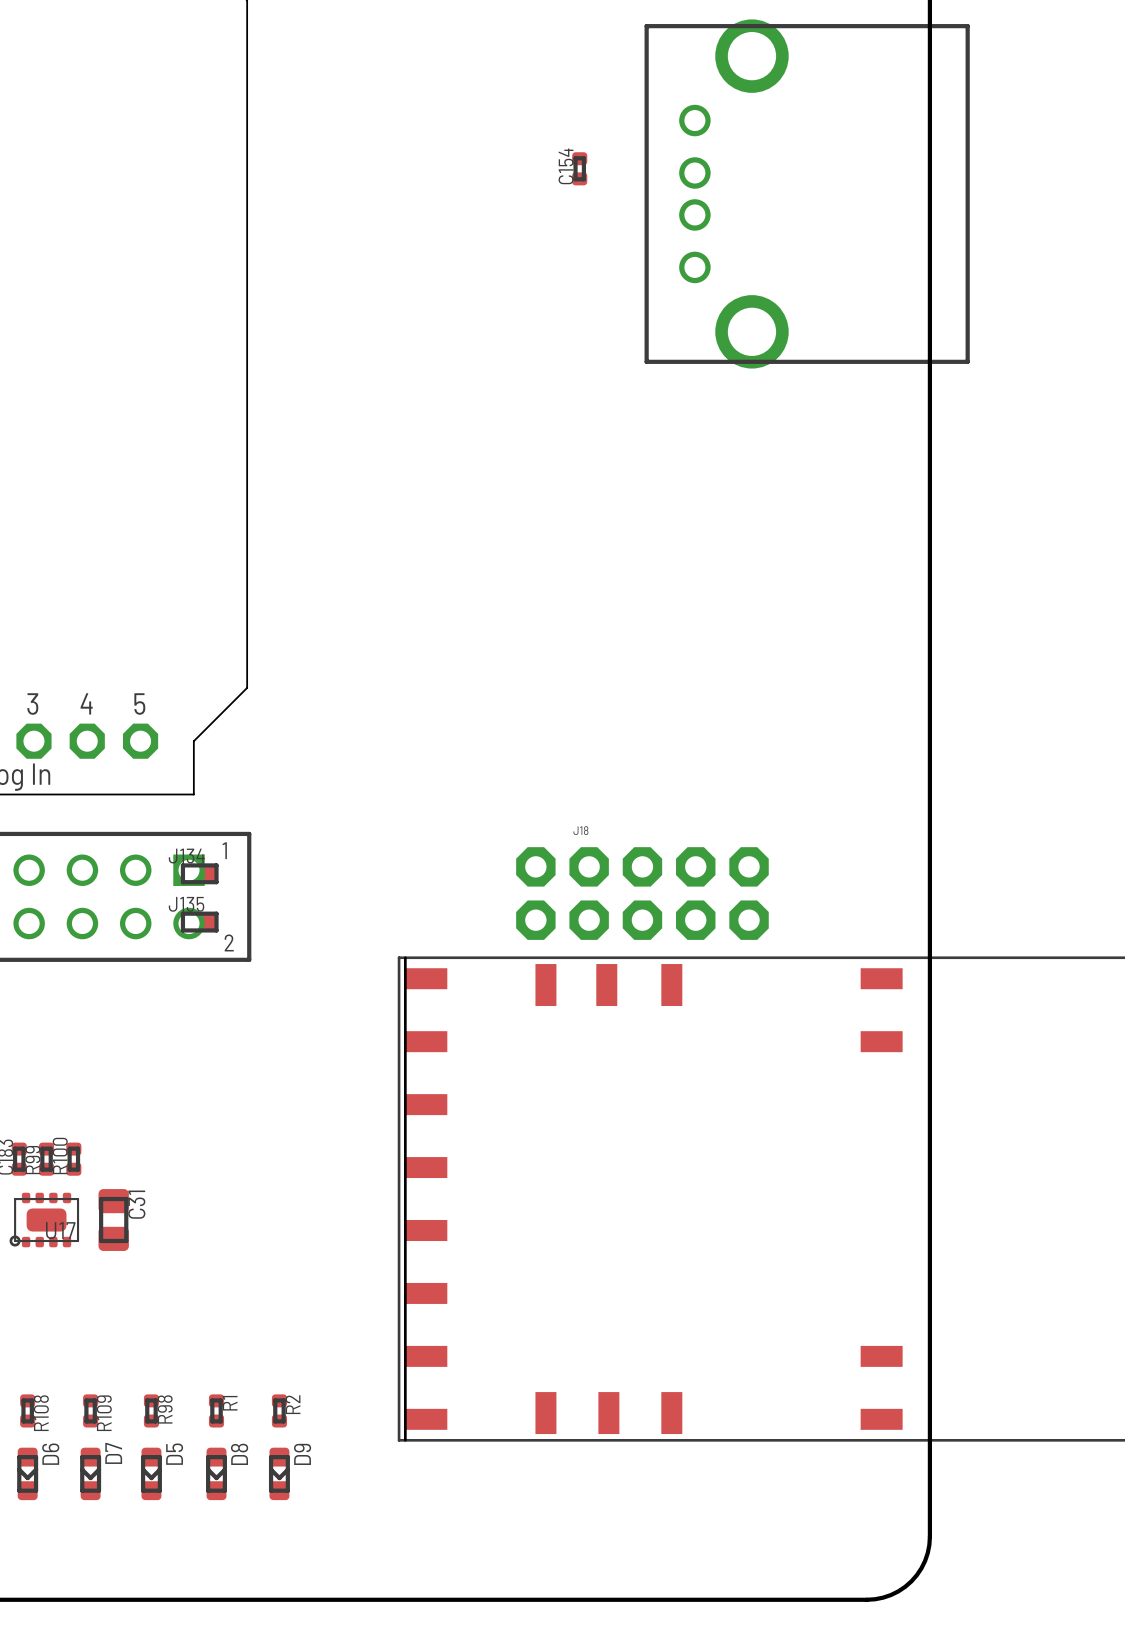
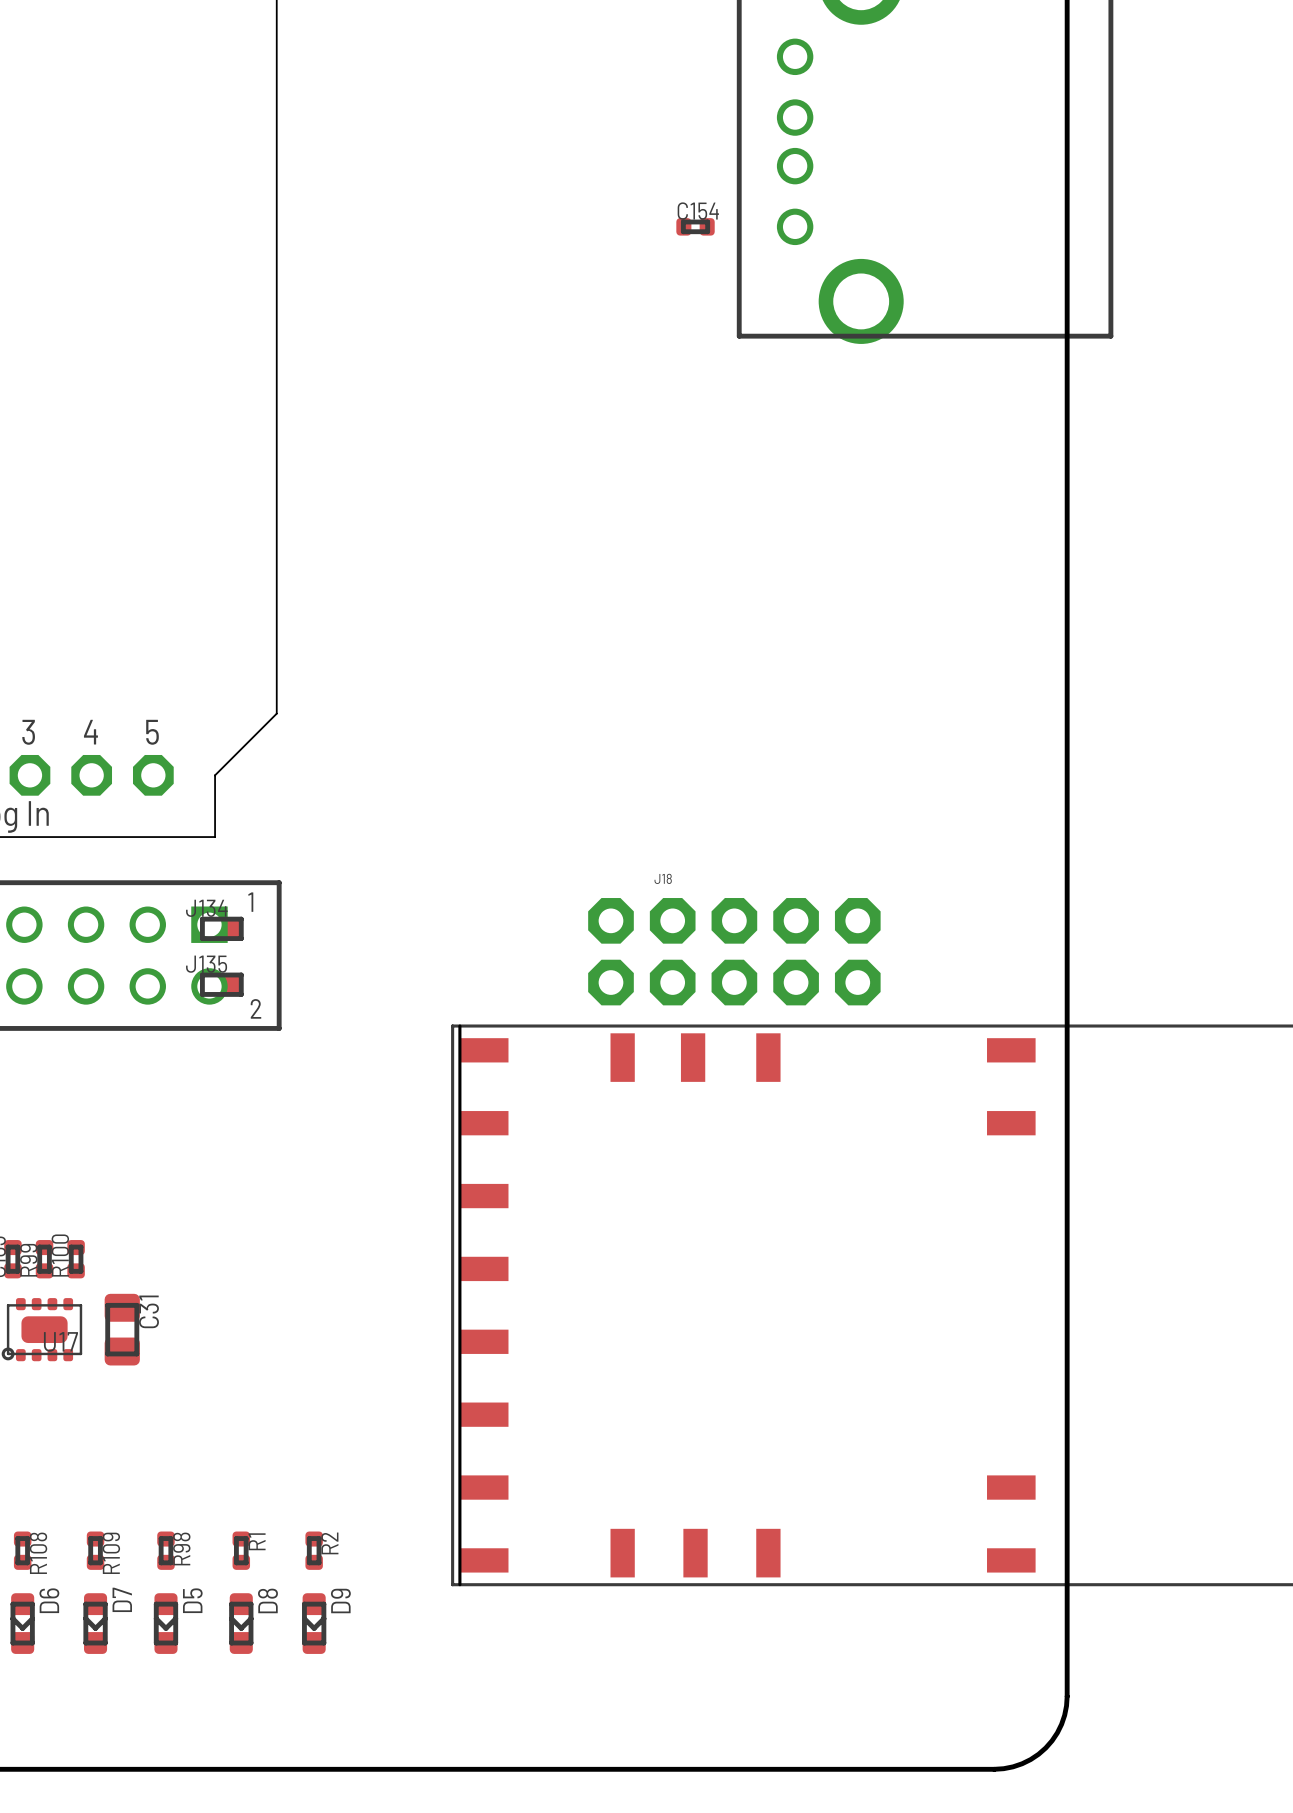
C154 rotation: 0° (579, 168) -> 90° clockwise (695, 226)
C154 position: (579, 168) -> (695, 226)

